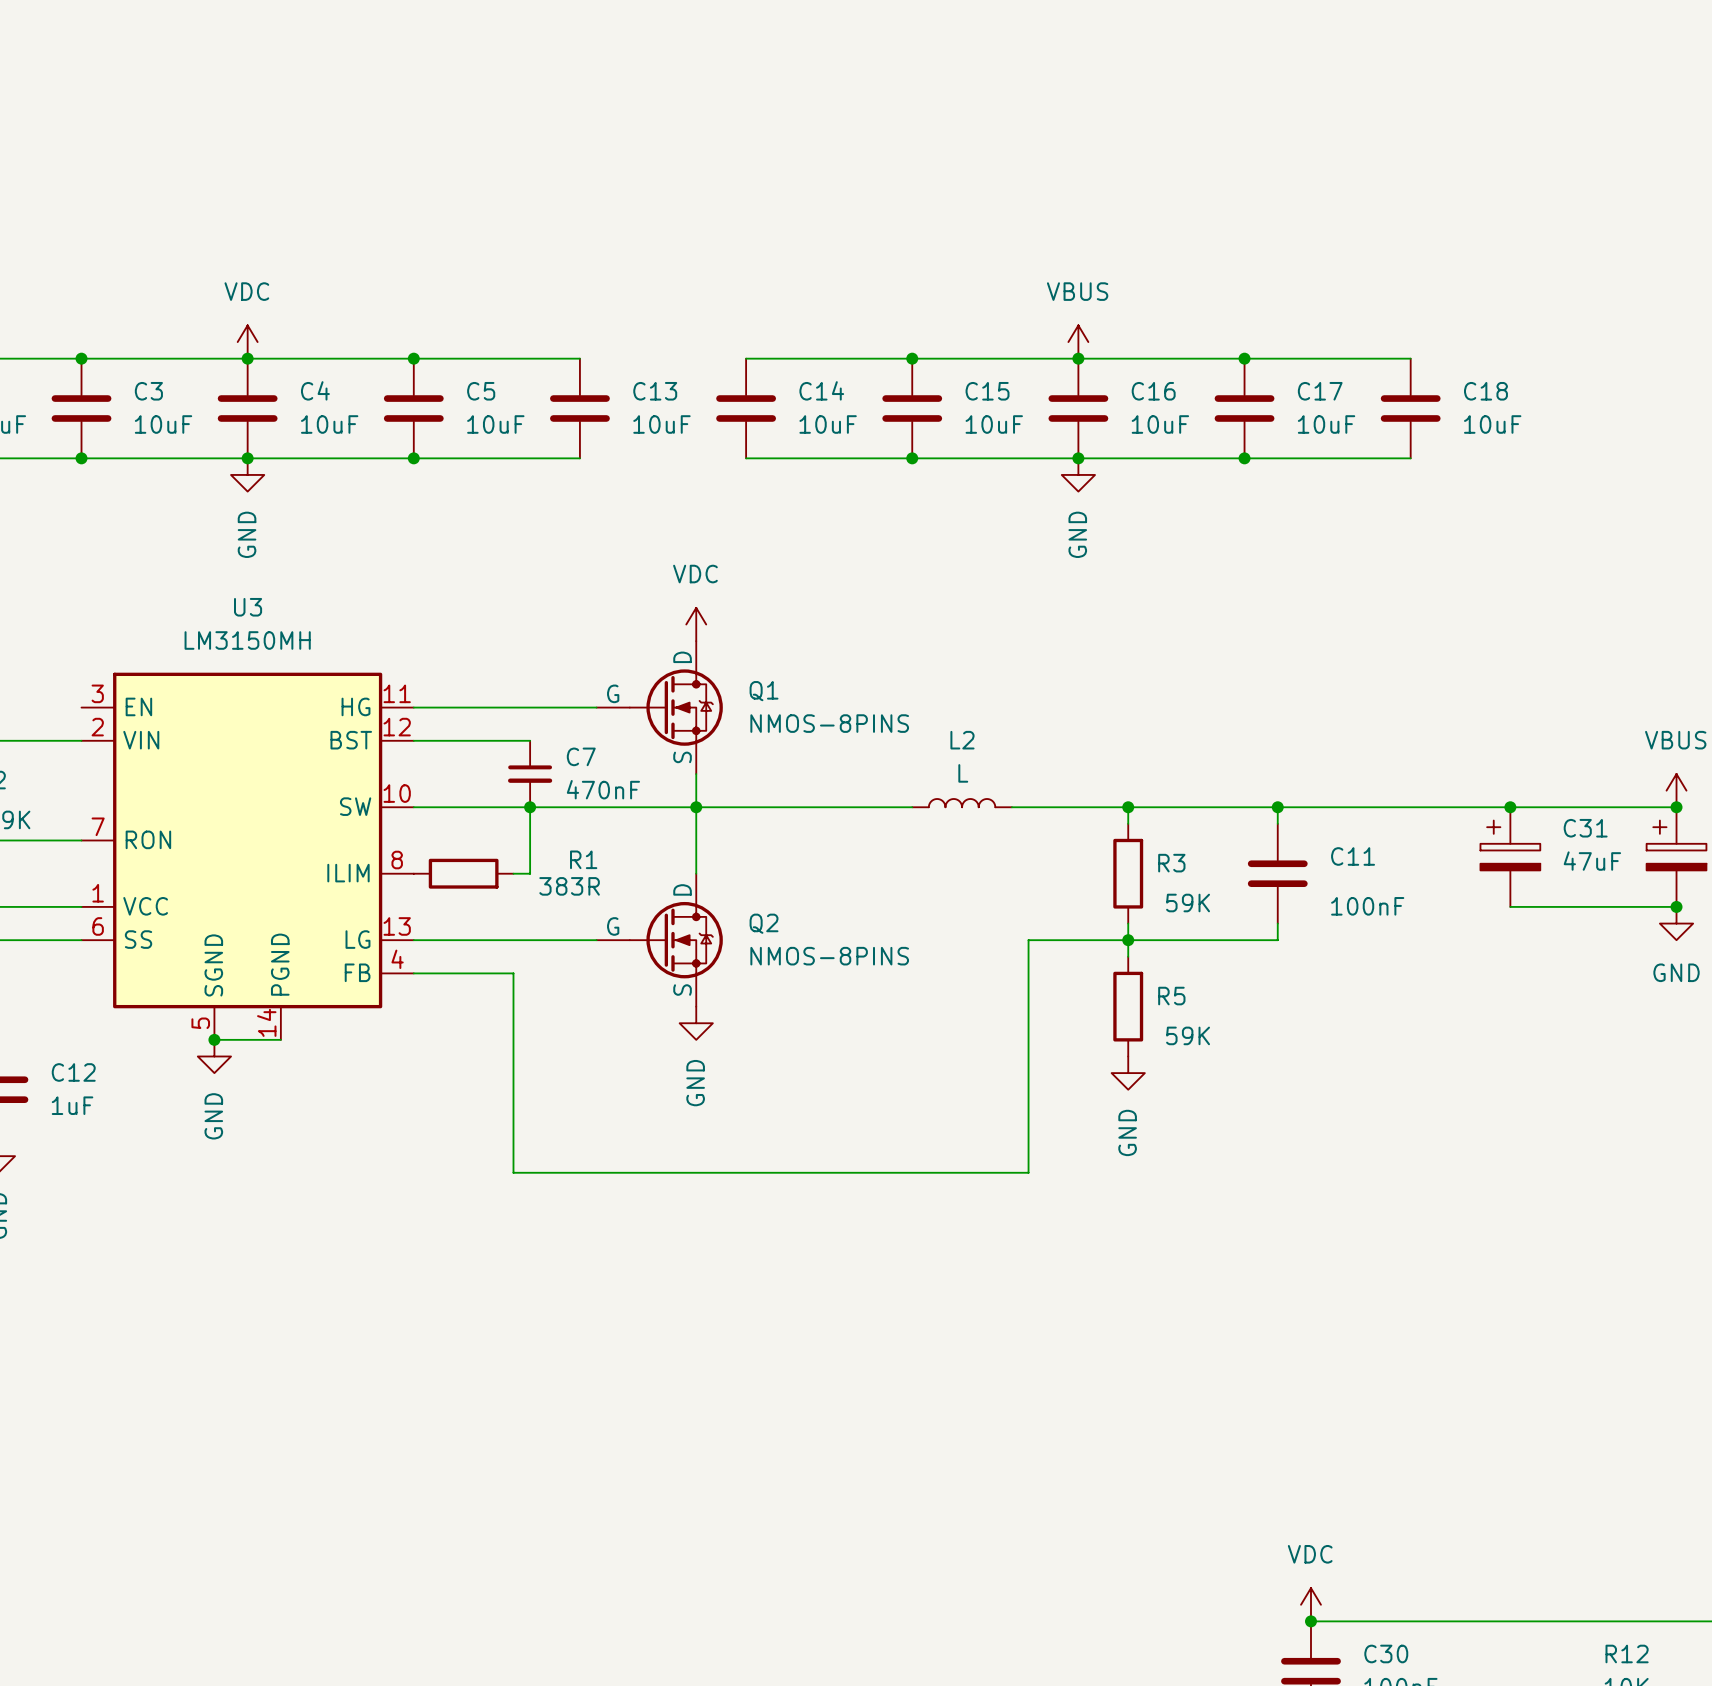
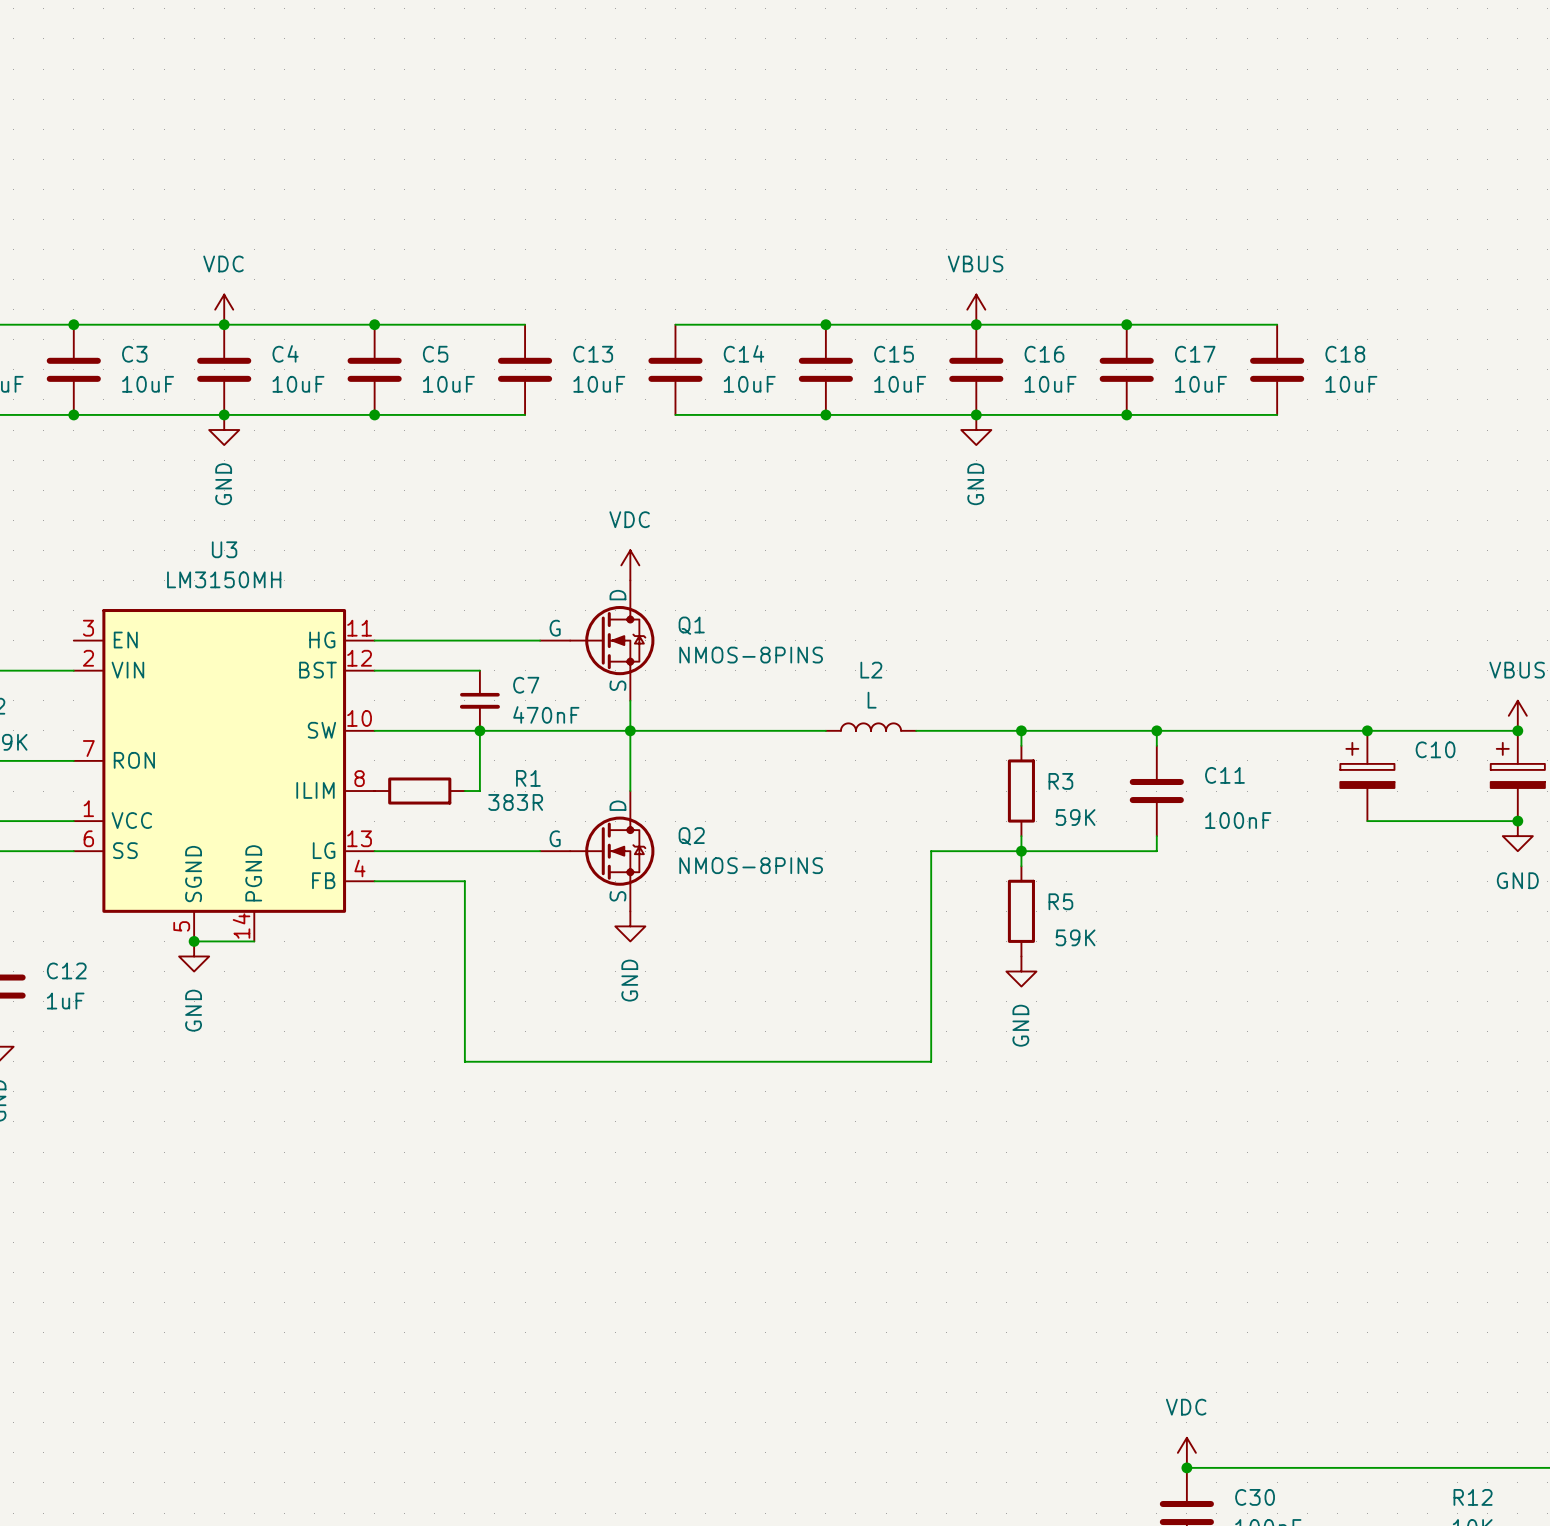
C31 name: C31 (1585, 828) -> C10 (1435, 749)
C31 value: 47uF (1592, 861) -> none

